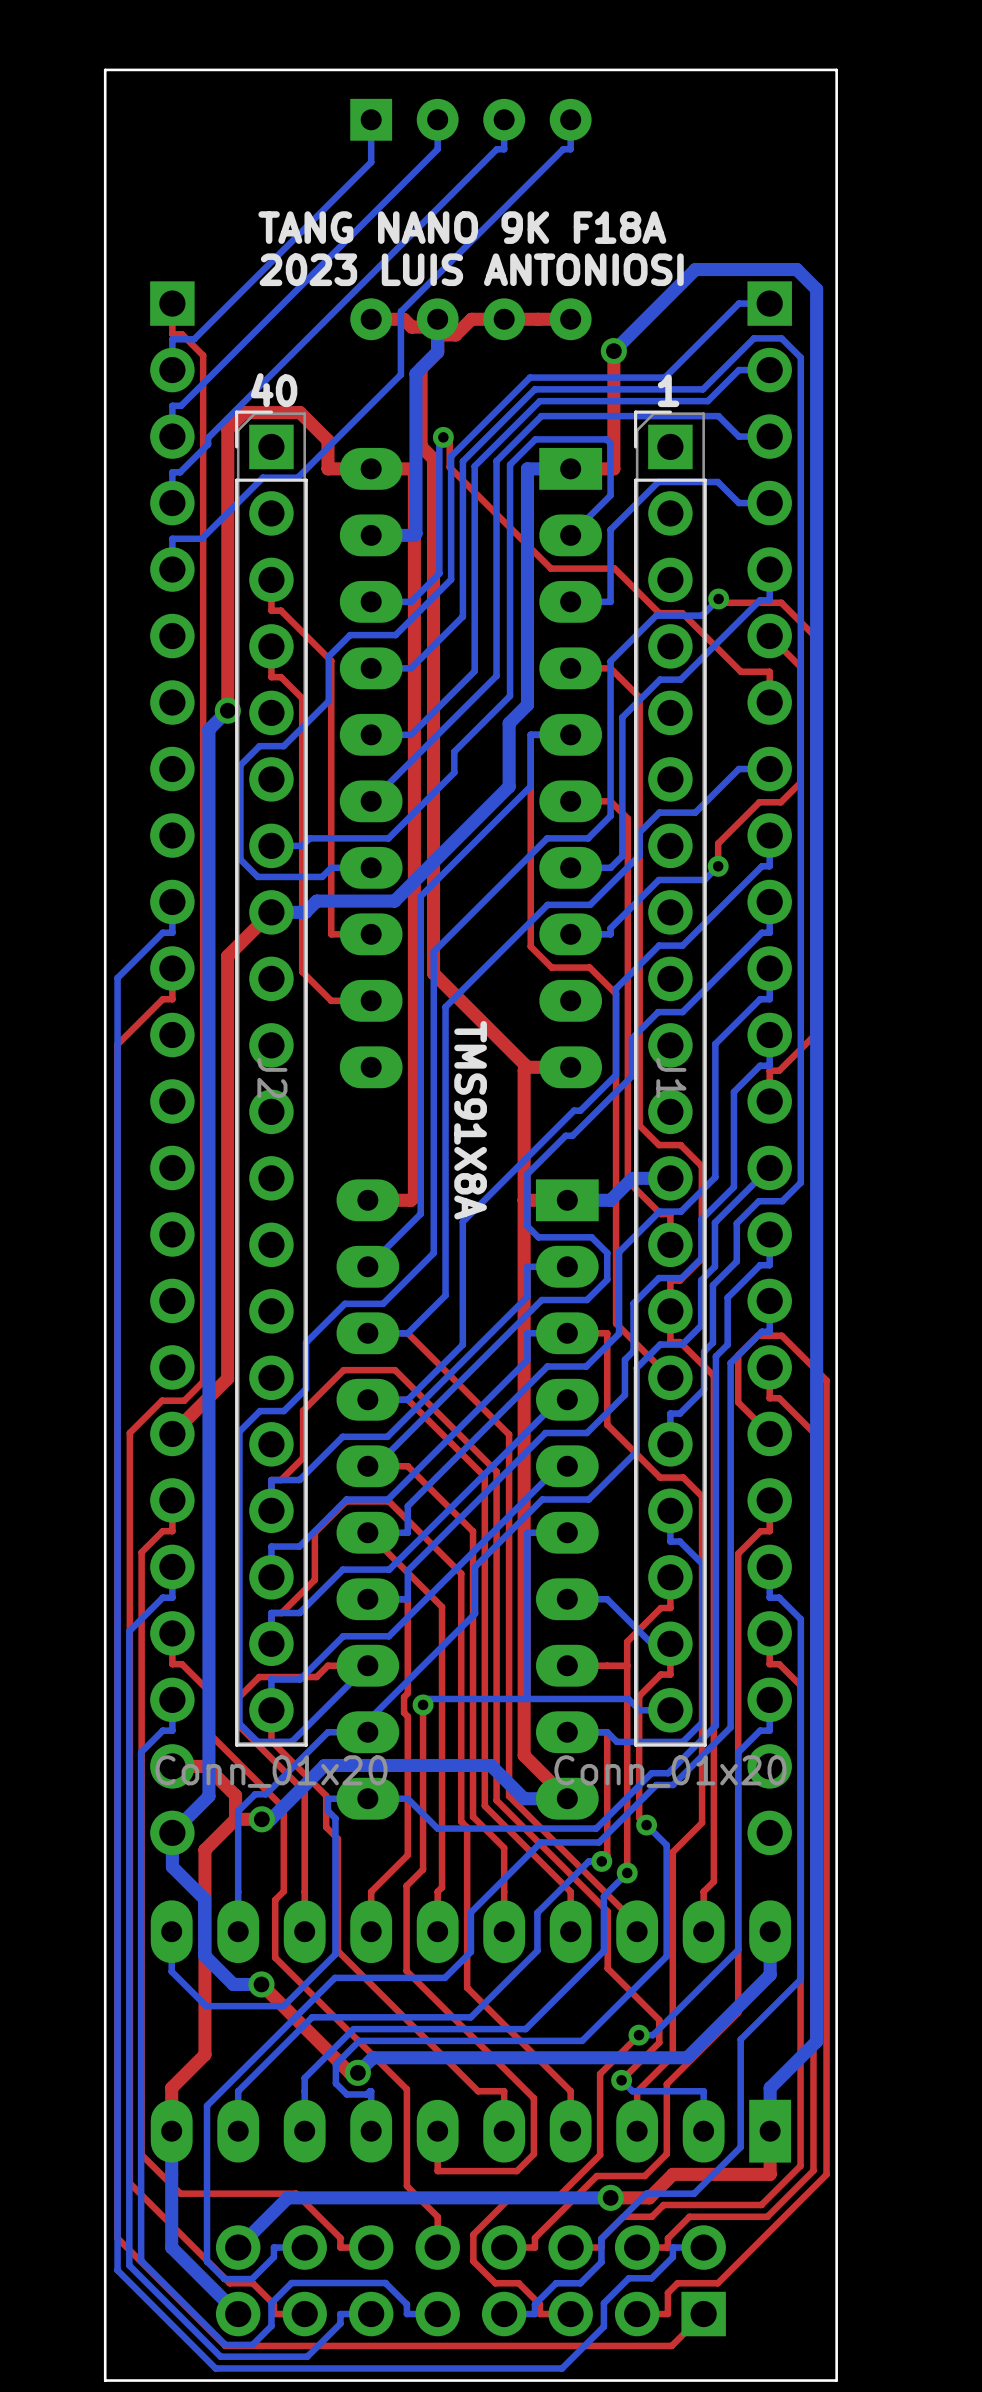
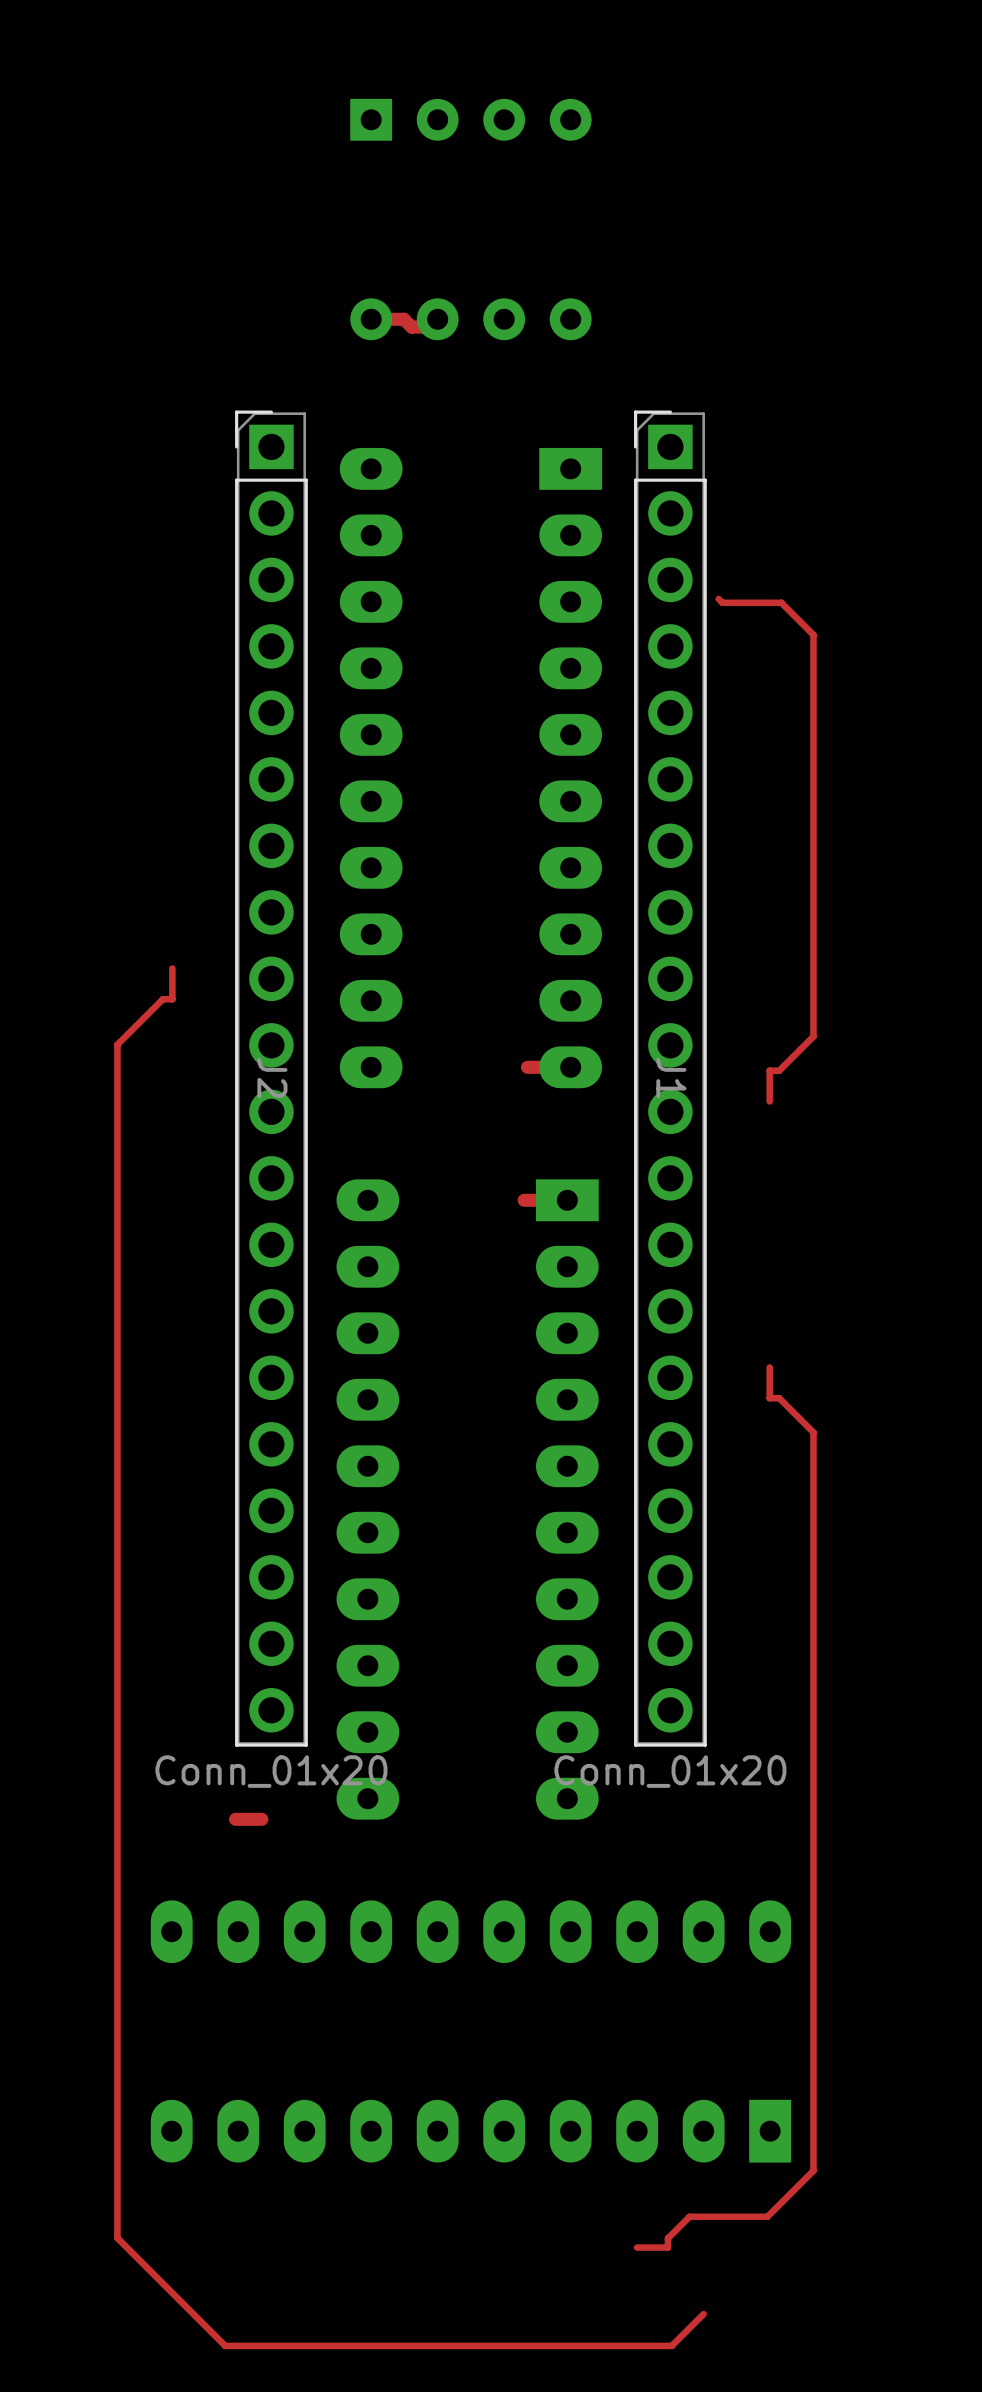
board edge: (836, 69) (836, 2380) (105, 2380) (105, 69) (836, 69) -> none
bottom track: (371, 119) (371, 162) (194, 339) (172, 339) (172, 370) -> none
bottom track: (437, 119) (437, 149) (181, 405) (172, 405) (172, 436) -> none
bottom track: (504, 119) (504, 149) (496, 149) (208, 437) (208, 444) (180, 472) (172, 472) (172, 503) -> none
bottom track: (570, 119) (570, 149) (563, 149) (400, 311) (400, 374) (297, 477) (262, 477) (201, 538) (172, 538) (172, 569) -> none
text: TANG NANO 9K F18A (462, 227) -> none
text: 2023 LUIS ANTONIOSI (471, 269) -> none
top track: (172, 303) (172, 334) (182, 334) (203, 355) (203, 1381) (184, 1400) (162, 1400) (129, 1432) (129, 2183) (229, 2283) (252, 2283) (273, 2304) (273, 2314) (304, 2314) -> none
bottom track: (769, 303) (738, 303) (664, 377) (530, 377) (451, 456) (451, 579) (395, 635) (350, 635) (328, 656) (328, 701) (283, 746) (259, 746) (240, 765) (240, 859) (257, 876) (322, 876) (331, 867) (371, 867) -> none
top track: (437, 319) (437, 351) (421, 368) (421, 446) (433, 459) (433, 973) (527, 1067) (524, 1070) (524, 1755) (567, 1798) -> none
bottom track: (437, 319) (437, 351) (415, 373) (415, 533) (414, 535) (371, 535) -> none
top track: (570, 319) (471, 319) (455, 334) (437, 334) -> none
top track: (613, 351) (613, 468) (570, 468) -> none
bottom track: (613, 351) (695, 269) (796, 269) (816, 289) (816, 2041) (770, 2087) (770, 2131) -> none
via: (613, 351) -> none
bottom track: (769, 370) (738, 370) (707, 401) (539, 401) (474, 466) (474, 671) (411, 734) (371, 734) -> none
text: 40 (274, 390) -> none
text: 1 (668, 390) -> none
bottom track: (769, 436) (738, 436) (718, 416) (541, 416) (496, 461) (496, 675) (371, 801) -> none
top track: (443, 437) (449, 443) (449, 467) (551, 568) (614, 568) (659, 613) (682, 613) (740, 671) (769, 671) (769, 702) -> none
bottom track: (443, 437) (439, 441) (439, 573) (411, 601) (371, 601) -> none
via: (443, 437) -> none
bottom track: (570, 468) (527, 468) (527, 704) (509, 723) (509, 786) (394, 901) (316, 901) (305, 912) (271, 912) -> none
bottom track: (769, 503) (738, 503) (717, 482) (658, 482) (610, 529) (610, 601) (570, 601) -> none
bottom track: (570, 535) (610, 495) (610, 443) (606, 439) (535, 439) (510, 464) (510, 696) (454, 751) (454, 772) (388, 838) (309, 838) (302, 845) (271, 845) -> none
bottom track: (769, 569) (769, 600) (760, 600) (680, 679) (660, 679) (622, 717) (622, 856) (610, 867) (570, 867) -> none
top track: (271, 579) (271, 610) (281, 610) (331, 660) (331, 934) (371, 934) -> none
bottom track: (718, 599) (701, 615) (656, 615) (610, 661) (610, 815) (588, 838) (547, 838) (433, 951) (433, 1253) (383, 1303) (344, 1303) (306, 1342) (306, 1388) (283, 1411) (260, 1411) (239, 1431) (239, 1723) (257, 1741) (291, 1741) (367, 1665) -> none
via: (718, 599) -> none
top track: (769, 636) (800, 666) (800, 782) (780, 802) (759, 802) (718, 843) (718, 866) -> none
top track: (271, 646) (271, 677) (281, 677) (302, 698) (302, 971) (331, 1000) (371, 1000) -> none
bottom track: (371, 668) (411, 668) (462, 616) (462, 461) (534, 389) (702, 389) (753, 338) (781, 338) (800, 357) (800, 1182) (782, 1201) (758, 1201) (736, 1223) (736, 1261) (712, 1285) (712, 1342) (704, 1351) (704, 1389) (679, 1413) (670, 1413) (670, 1444) -> none
top track: (570, 668) (610, 668) (639, 697) (639, 1125) (659, 1145) (680, 1145) (701, 1166) (701, 1258) (680, 1280) (670, 1280) (670, 1342) (679, 1342) (713, 1375) (713, 1881) (703, 1891) (703, 1931) -> none
top track: (227, 710) (227, 428) (244, 412) (300, 412) (327, 440) (327, 468) (414, 468) (414, 1196) (411, 1200) (367, 1200) -> none
bottom track: (227, 710) (208, 729) (208, 1796) (172, 1832) (172, 1866) (204, 1899) (204, 1955) (233, 1984) (261, 1984) -> none
via: (227, 710) -> none
top track: (570, 734) (530, 734) (530, 946) (551, 967) (589, 967) (616, 993) (616, 1323) (670, 1377) -> none
bottom track: (570, 734) (530, 734) (530, 786) (420, 896) (420, 1213) (367, 1266) -> none
bottom track: (769, 769) (738, 769) (695, 812) (659, 812) (639, 832) (639, 855) (590, 904) (547, 904) (445, 1006) (445, 1295) (407, 1333) (367, 1333) -> none
top track: (570, 801) (610, 801) (627, 818) (627, 1181) (660, 1214) (670, 1214) (670, 1244) -> none
bottom track: (769, 835) (769, 866) (761, 866) (682, 945) (659, 945) (615, 988) (615, 1075) (580, 1110) (573, 1110) (462, 1221) (462, 1344) (407, 1399) (367, 1399) -> none
bottom track: (718, 866) (704, 879) (658, 879) (610, 928) (610, 934) (570, 934) -> none
via: (718, 866) -> none
bottom track: (172, 902) (172, 932) (162, 932) (117, 978) (117, 2270) (215, 2368) (562, 2368) (603, 2326) (603, 2303) (628, 2278) (651, 2278) (672, 2257) (672, 2247) (703, 2247) -> none
bottom track: (769, 902) (769, 932) (761, 932) (682, 1012) (658, 1012) (632, 1038) (632, 1076) (572, 1135) (565, 1135) (527, 1174) (527, 1226) (538, 1237) (591, 1237) (607, 1252) (607, 1279) (586, 1300) (541, 1300) (375, 1466) (367, 1466) -> none
top track: (271, 912) (227, 956) (227, 1378) (172, 1433) -> none
bottom track: (769, 968) (769, 999) (760, 999) (715, 1044) (715, 1177) (680, 1211) (659, 1211) (619, 1252) (619, 1333) (586, 1366) (547, 1366) (407, 1506) (407, 1532) (367, 1532) -> none
bottom track: (769, 1034) (769, 1065) (760, 1065) (733, 1091) (733, 1187) (701, 1219) (701, 1258) (681, 1278) (658, 1278) (633, 1303) (633, 1351) (624, 1359) (624, 1395) (586, 1433) (545, 1433) (407, 1570) (407, 1599) (367, 1599) -> none
part: (172, 1068) -> none
part: (769, 1068) -> none
text: TMS91X8A (470, 1120) -> none
bottom track: (769, 1167) (714, 1222) (714, 1266) (701, 1280) (701, 1325) (682, 1344) (660, 1344) (636, 1367) (636, 1451) (588, 1499) (542, 1499) (475, 1566) (475, 1613) (356, 1732) -> none
bottom track: (670, 1178) (632, 1178) (610, 1200) (567, 1200) -> none
bottom track: (769, 1234) (769, 1265) (760, 1265) (727, 1297) (727, 1344) (715, 1356) (715, 1725) (668, 1773) (651, 1773) (596, 1828) (437, 1828) (407, 1798) (327, 1798) (327, 1810) (335, 1818) (335, 1954) (283, 2006) (206, 2006) (171, 1971) (171, 1931) -> none
bottom track: (567, 1266) (527, 1266) (527, 1296) (387, 1436) (342, 1436) (299, 1480) (271, 1480) (271, 1510) -> none
bottom track: (769, 1300) (769, 1331) (761, 1331) (730, 1362) (730, 1727) (673, 1785) (656, 1785) (599, 1842) (540, 1842) (470, 1912) (470, 1951) (444, 1977) (334, 1977) (207, 2105) (207, 2261) (224, 2279) (252, 2279) (273, 2257) (273, 2247) (304, 2247) -> none
top track: (367, 1333) (407, 1333) (509, 1434) (509, 1796) (637, 1924) (637, 1931) -> none
top track: (567, 1333) (607, 1333) (607, 1424) (660, 1477) (683, 1477) (702, 1496) (702, 1822) (672, 1852) (672, 2055) (637, 2091) (637, 2131) -> none
bottom track: (567, 1333) (527, 1333) (527, 1360) (388, 1499) (346, 1499) (299, 1546) (271, 1546) (271, 1577) -> none
top track: (367, 1399) (407, 1399) (484, 1476) (484, 1805) (570, 1891) (570, 1931) -> none
bottom track: (567, 1399) (559, 1399) (389, 1569) (342, 1569) (299, 1613) (271, 1613) (271, 1643) -> none
top track: (769, 1433) (738, 1402) (738, 1355) (757, 1335) (781, 1335) (826, 1380) (826, 2174) (717, 2283) (677, 2283) (667, 2292) (667, 2314) (637, 2314) -> none
top track: (367, 1466) (407, 1466) (473, 1531) (473, 1816) (504, 1847) (504, 1931) -> none
bottom track: (567, 1466) (559, 1466) (388, 1636) (343, 1636) (300, 1679) (271, 1679) (271, 1710) -> none
top track: (172, 1500) (172, 1531) (162, 1531) (141, 1552) (141, 2154) (180, 2193) (296, 2193) (340, 2237) (340, 2247) (371, 2247) -> none
top track: (769, 1500) (769, 1531) (760, 1531) (738, 1553) (738, 2012) (666, 2084) (666, 2154) (644, 2176) (596, 2176) (534, 2237) (534, 2247) (504, 2247) -> none
top track: (271, 1510) (271, 1480) (281, 1480) (303, 1457) (303, 1410) (343, 1370) (395, 1370) (496, 1471) (496, 1800) (607, 1911) (607, 1968) (659, 2020) (659, 2042) (621, 2080) -> none
bottom track: (670, 1510) (670, 1541) (680, 1541) (702, 1563) (702, 1722) (682, 1741) (616, 1741) (607, 1732) (567, 1732) -> none
top track: (367, 1532) (442, 1606) (442, 1887) (437, 1891) (437, 1931) -> none
bottom track: (567, 1532) (527, 1532) (527, 1698) -> none
bottom track: (172, 1566) (172, 1597) (162, 1597) (129, 1631) (129, 2265) (220, 2356) (307, 2356) (340, 2323) (340, 2314) (371, 2314) -> none
bottom track: (769, 1566) (769, 1597) (779, 1597) (800, 1619) (800, 1979) (740, 2039) (740, 2147) (694, 2193) (646, 2193) (601, 2238) (601, 2262) (580, 2283) (556, 2283) (534, 2304) (534, 2314) (504, 2314) -> none
top track: (670, 1577) (670, 1608) (660, 1608) (627, 1641) (627, 1872) -> none
top track: (367, 1599) (407, 1599) (407, 1693) (404, 1697) (404, 1712) (407, 1716) (407, 1855) (371, 1891) (371, 1931) -> none
bottom track: (567, 1599) (607, 1599) (651, 1643) (670, 1643) -> none
top track: (172, 1633) (172, 1664) (181, 1664) (208, 1690) (208, 1732) (283, 1808) (283, 1891) (275, 1899) (275, 1957) (406, 2089) (406, 2186) (437, 2216) (437, 2247) -> none
top track: (769, 1633) (769, 1664) (779, 1664) (800, 1685) (800, 2165) (761, 2205) (663, 2205) (651, 2216) (623, 2216) (601, 2238) (601, 2247) (570, 2247) -> none
top track: (271, 1643) (271, 1613) (281, 1613) (314, 1579) (314, 1532) (346, 1501) (388, 1501) (461, 1573) (461, 1821) (467, 1827) (467, 1987) (570, 2091) (570, 2131) -> none
top track: (670, 1643) (670, 1674) (660, 1674) (639, 1696) (639, 1817) (646, 1825) -> none
top track: (367, 1665) (327, 1665) (316, 1677) (259, 1677) (238, 1697) (238, 1725) (304, 1791) (304, 1931) -> none
top track: (627, 1665) (567, 1665) -> none
bottom track: (172, 1699) (172, 1730) (162, 1730) (141, 1752) (141, 2260) (225, 2344) (252, 2344) (271, 2326) (271, 2303) (291, 2283) (385, 2283) (406, 2304) (406, 2314) (437, 2314) -> none
bottom track: (769, 1699) (769, 1730) (760, 1730) (738, 1752) (738, 1949) (653, 2035) (638, 2035) -> none
top track: (423, 1704) (423, 1869) (406, 1885) (406, 1971) (533, 2098) (533, 2154) (516, 2171) (437, 2171) (437, 2131) -> none
bottom track: (423, 1704) (429, 1698) (628, 1698) (639, 1710) (670, 1710) -> none
via: (423, 1704) -> none
top track: (271, 1710) (271, 1741) (326, 1795) (326, 1827) (337, 1838) (337, 1951) (478, 2091) (504, 2091) (504, 2131) -> none
bottom track: (367, 1732) (327, 1732) (265, 1794) (255, 1794) (238, 1811) (238, 1931) -> none
top track: (567, 1732) (607, 1732) (607, 1855) (601, 1861) -> none
top track: (172, 1766) (206, 1766) (235, 1795) (235, 1819) (204, 1849) (204, 2054) (171, 2087) (171, 2131) -> none
bottom track: (567, 1798) (524, 1798) (490, 1765) (324, 1765) (270, 1819) (261, 1819) -> none
via: (261, 1819) -> none
bottom track: (646, 1825) (666, 1845) (666, 1956) (582, 2040) (359, 2040) (335, 2064) (335, 2083) (346, 2094) (366, 2094) (371, 2091) (371, 2131) -> none
via: (646, 1825) -> none
bottom track: (601, 1861) (588, 1861) (537, 1912) (537, 1950) (470, 2017) (312, 2017) (238, 2091) (238, 2131) -> none
via: (601, 1861) -> none
bottom track: (627, 1872) (603, 1896) (603, 1950) (525, 2029) (353, 2029) (304, 2078) (304, 2131) -> none
via: (627, 1872) -> none
bottom track: (770, 1931) (770, 1974) (687, 2057) (372, 2057) (357, 2072) -> none
top track: (261, 1984) (349, 2072) (357, 2072) -> none
via: (261, 1984) -> none
top track: (638, 2035) (600, 2074) (600, 2154) (554, 2200) (507, 2200) (473, 2234) (473, 2261) (495, 2283) (518, 2283) (539, 2304) (539, 2314) (570, 2314) -> none
via: (638, 2035) -> none
via: (357, 2072) -> none
bottom track: (621, 2080) (632, 2091) (703, 2091) (703, 2131) -> none
via: (621, 2080) -> none
bottom track: (171, 2131) (171, 2247) (238, 2314) -> none
top track: (770, 2131) (770, 2174) (672, 2174) (649, 2197) (610, 2197) -> none
bottom track: (610, 2197) (287, 2197) (238, 2247) -> none
via: (610, 2197) -> none
part: (470, 2280) -> none

